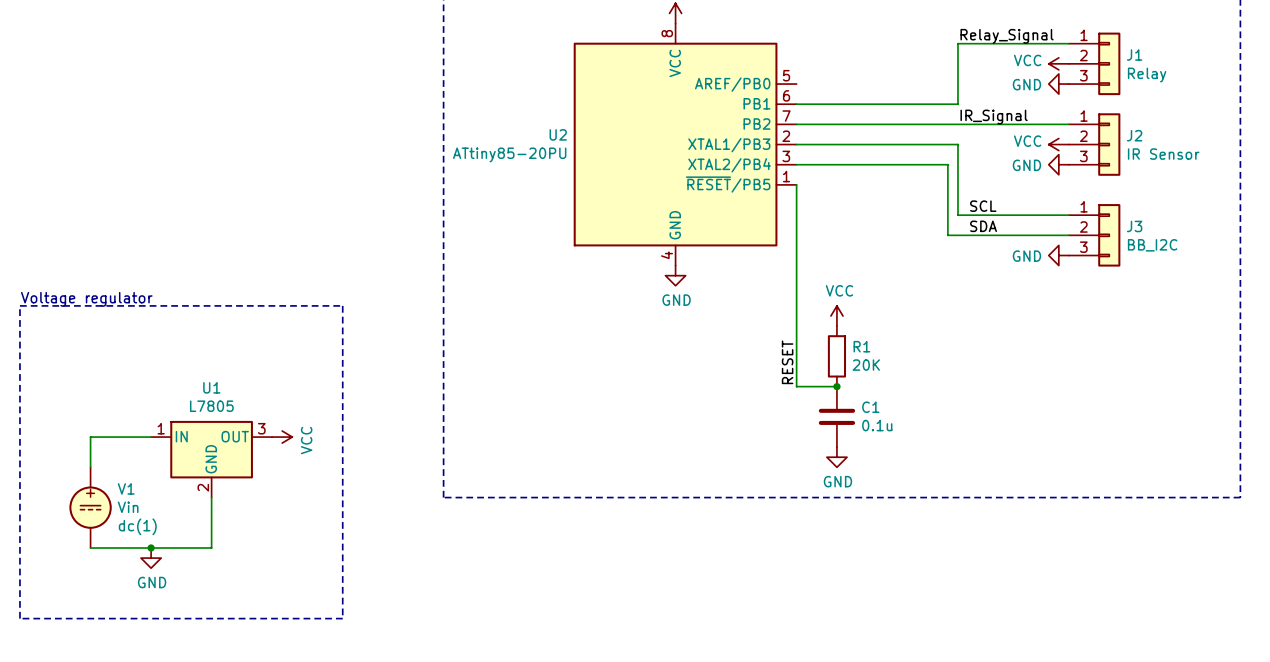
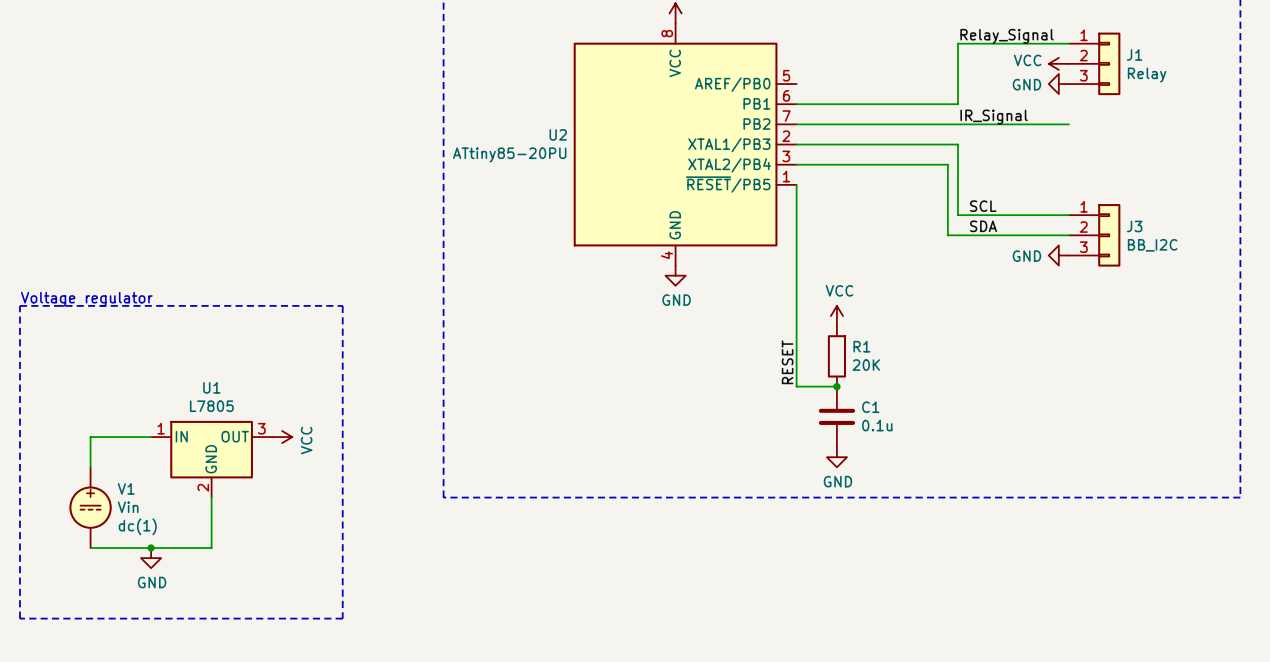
power symbol: VCC (1058, 144) -> none
J2: IR Sensor (1094, 144) -> none
power symbol: GND (1058, 164) -> none

